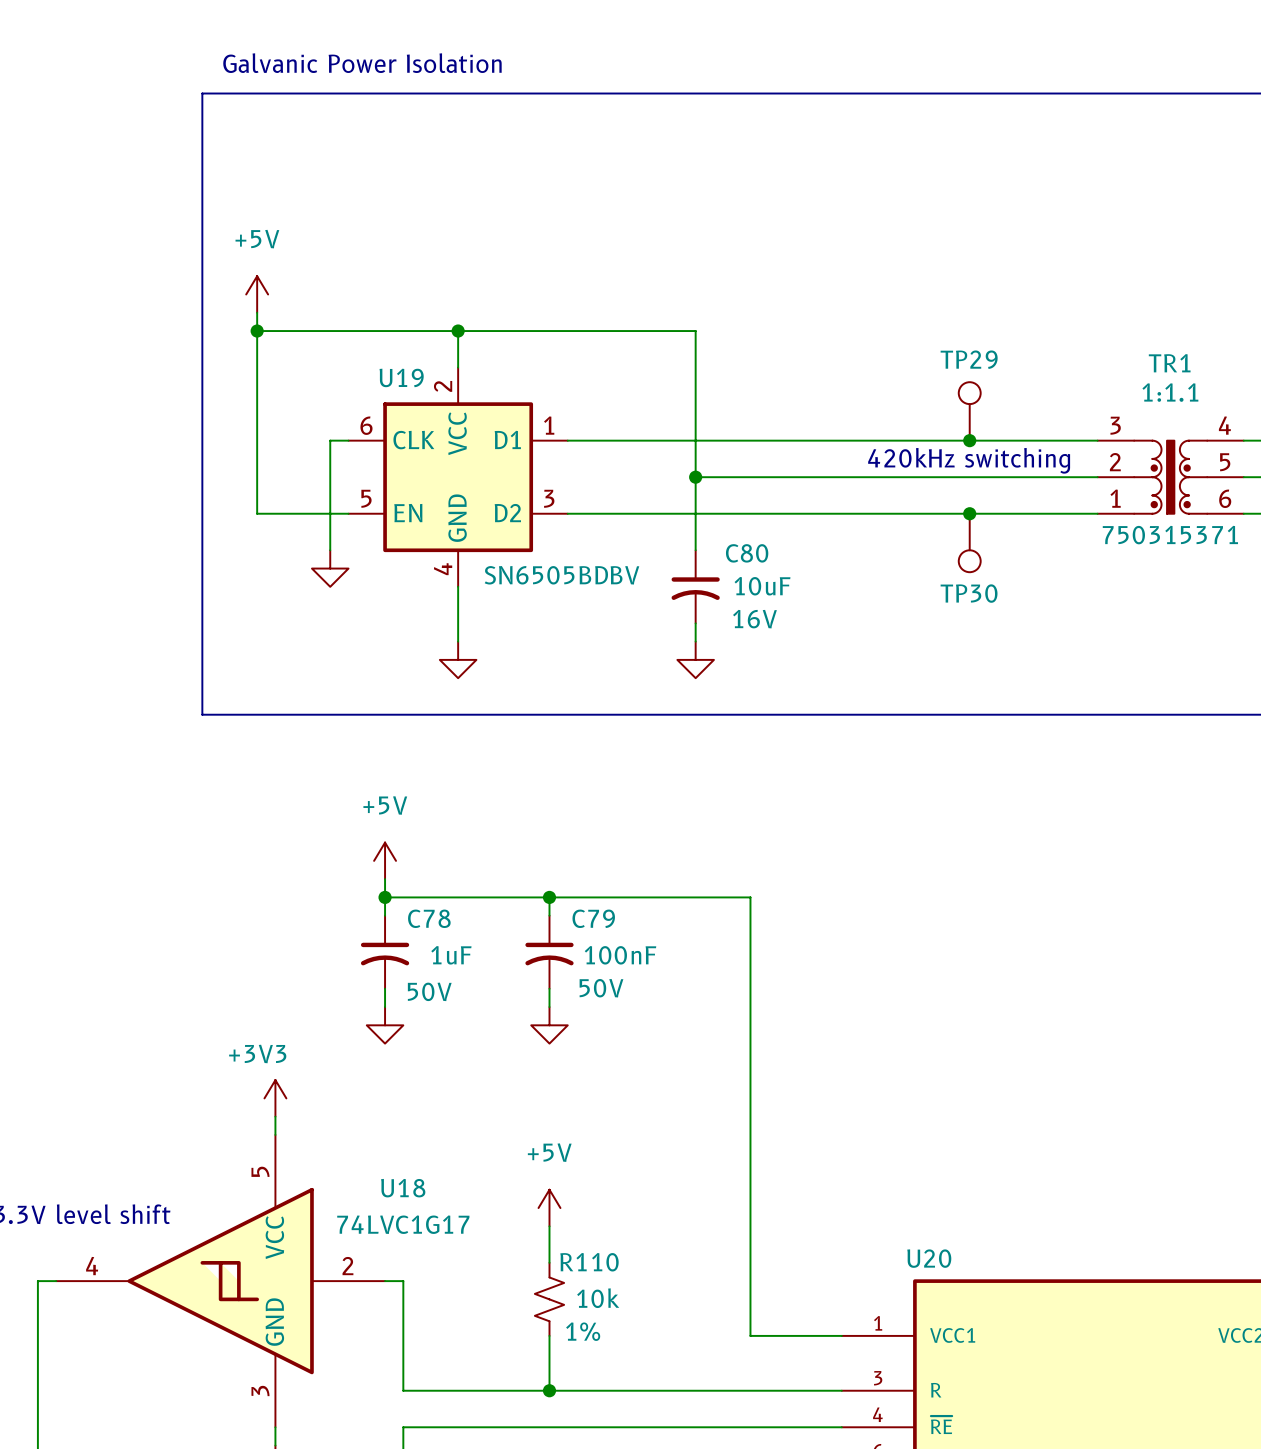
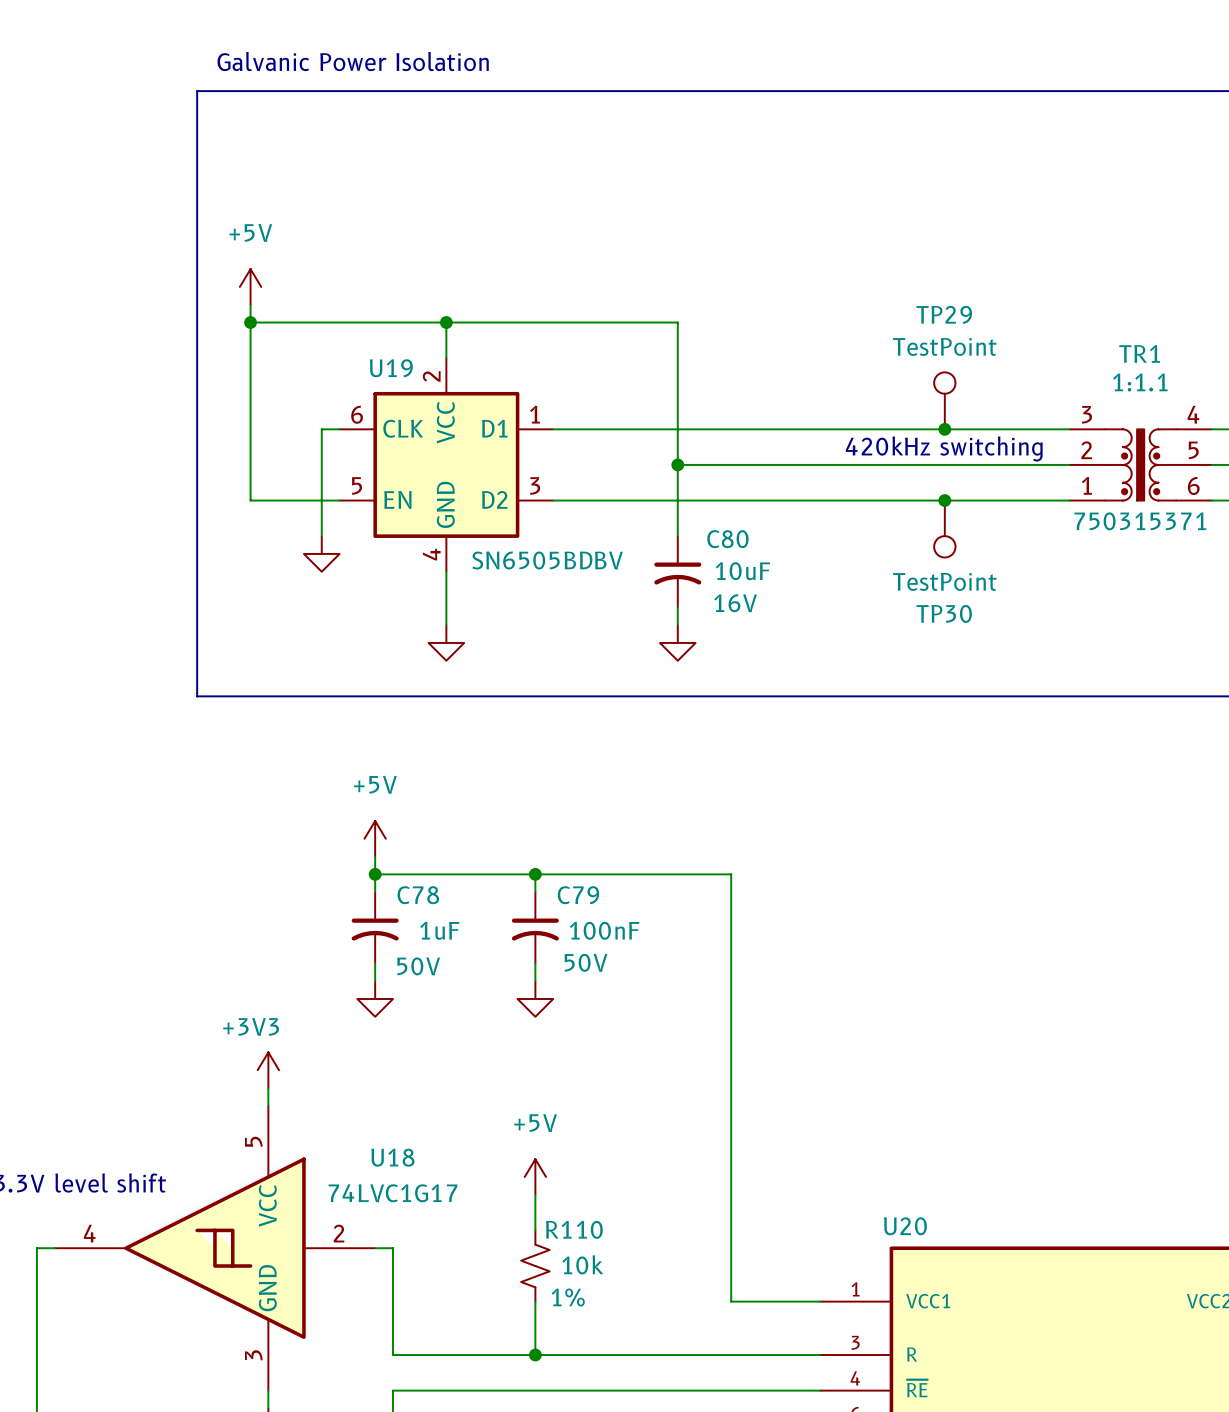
TP29 value: none -> TestPoint (944, 346)
TP29 name position: TP29 (969, 359) -> TP29 (944, 314)
TP30 name position: TP30 (969, 593) -> TP30 (944, 613)
TP30 value: none -> TestPoint (944, 581)

